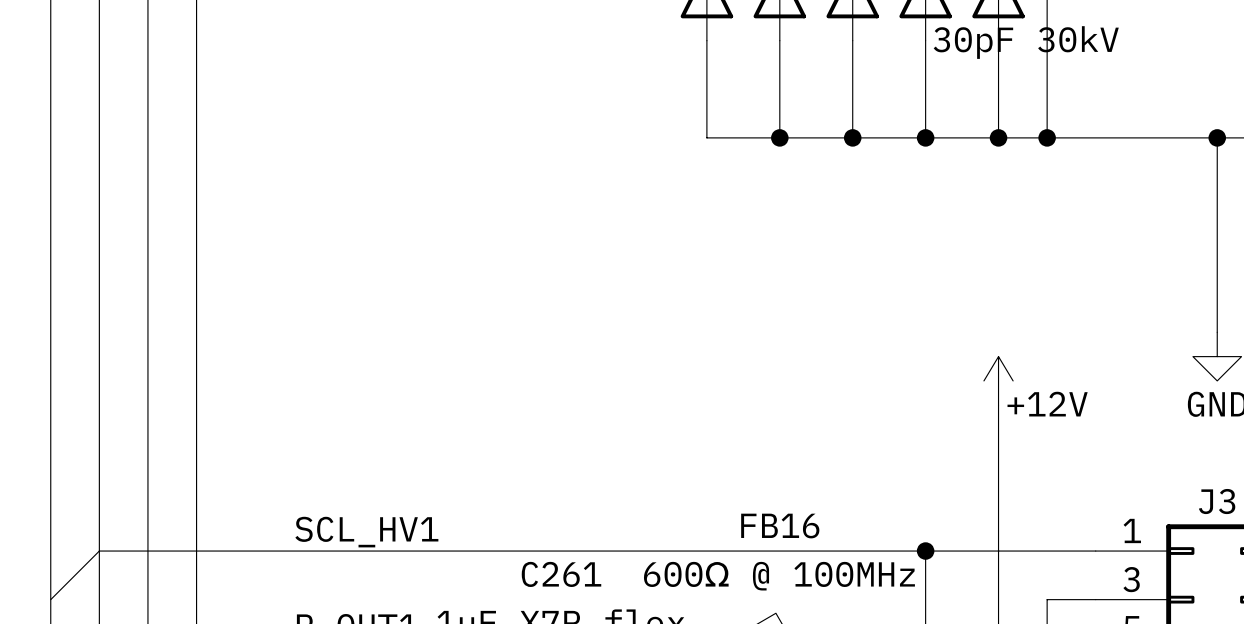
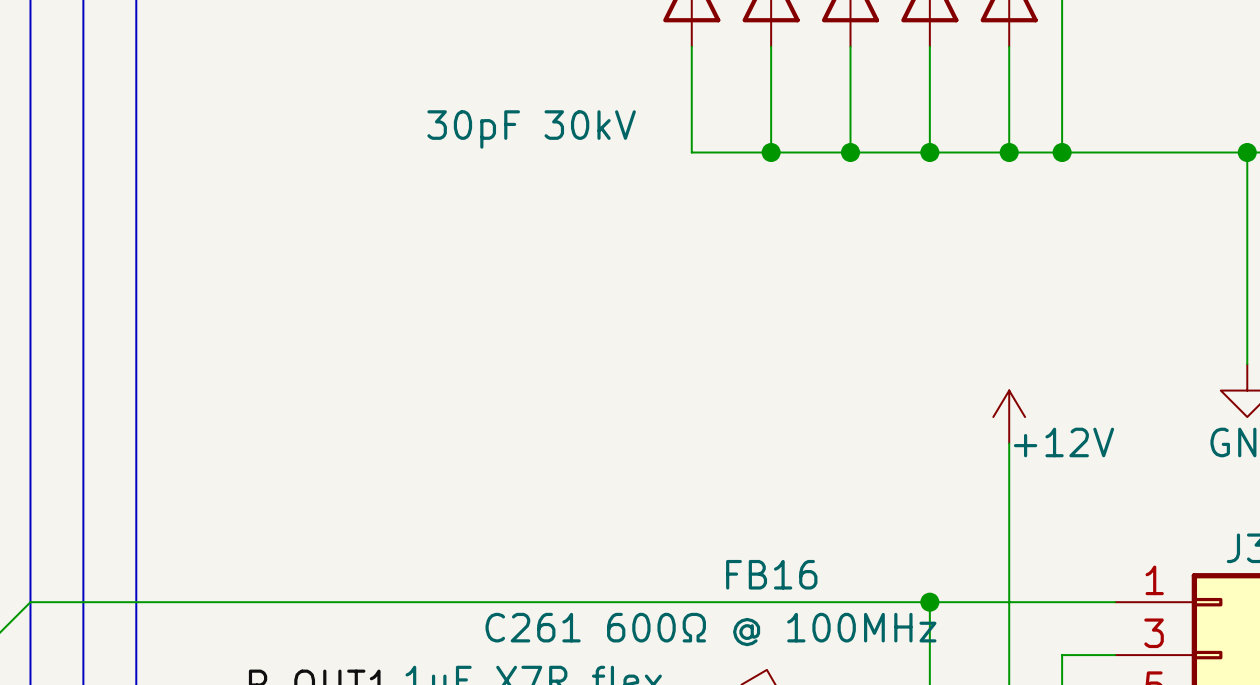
part value position: 30pF 30kV (1026, 42) -> 30pF 30kV (531, 129)
label: SCL_HV1 (366, 532) -> none

